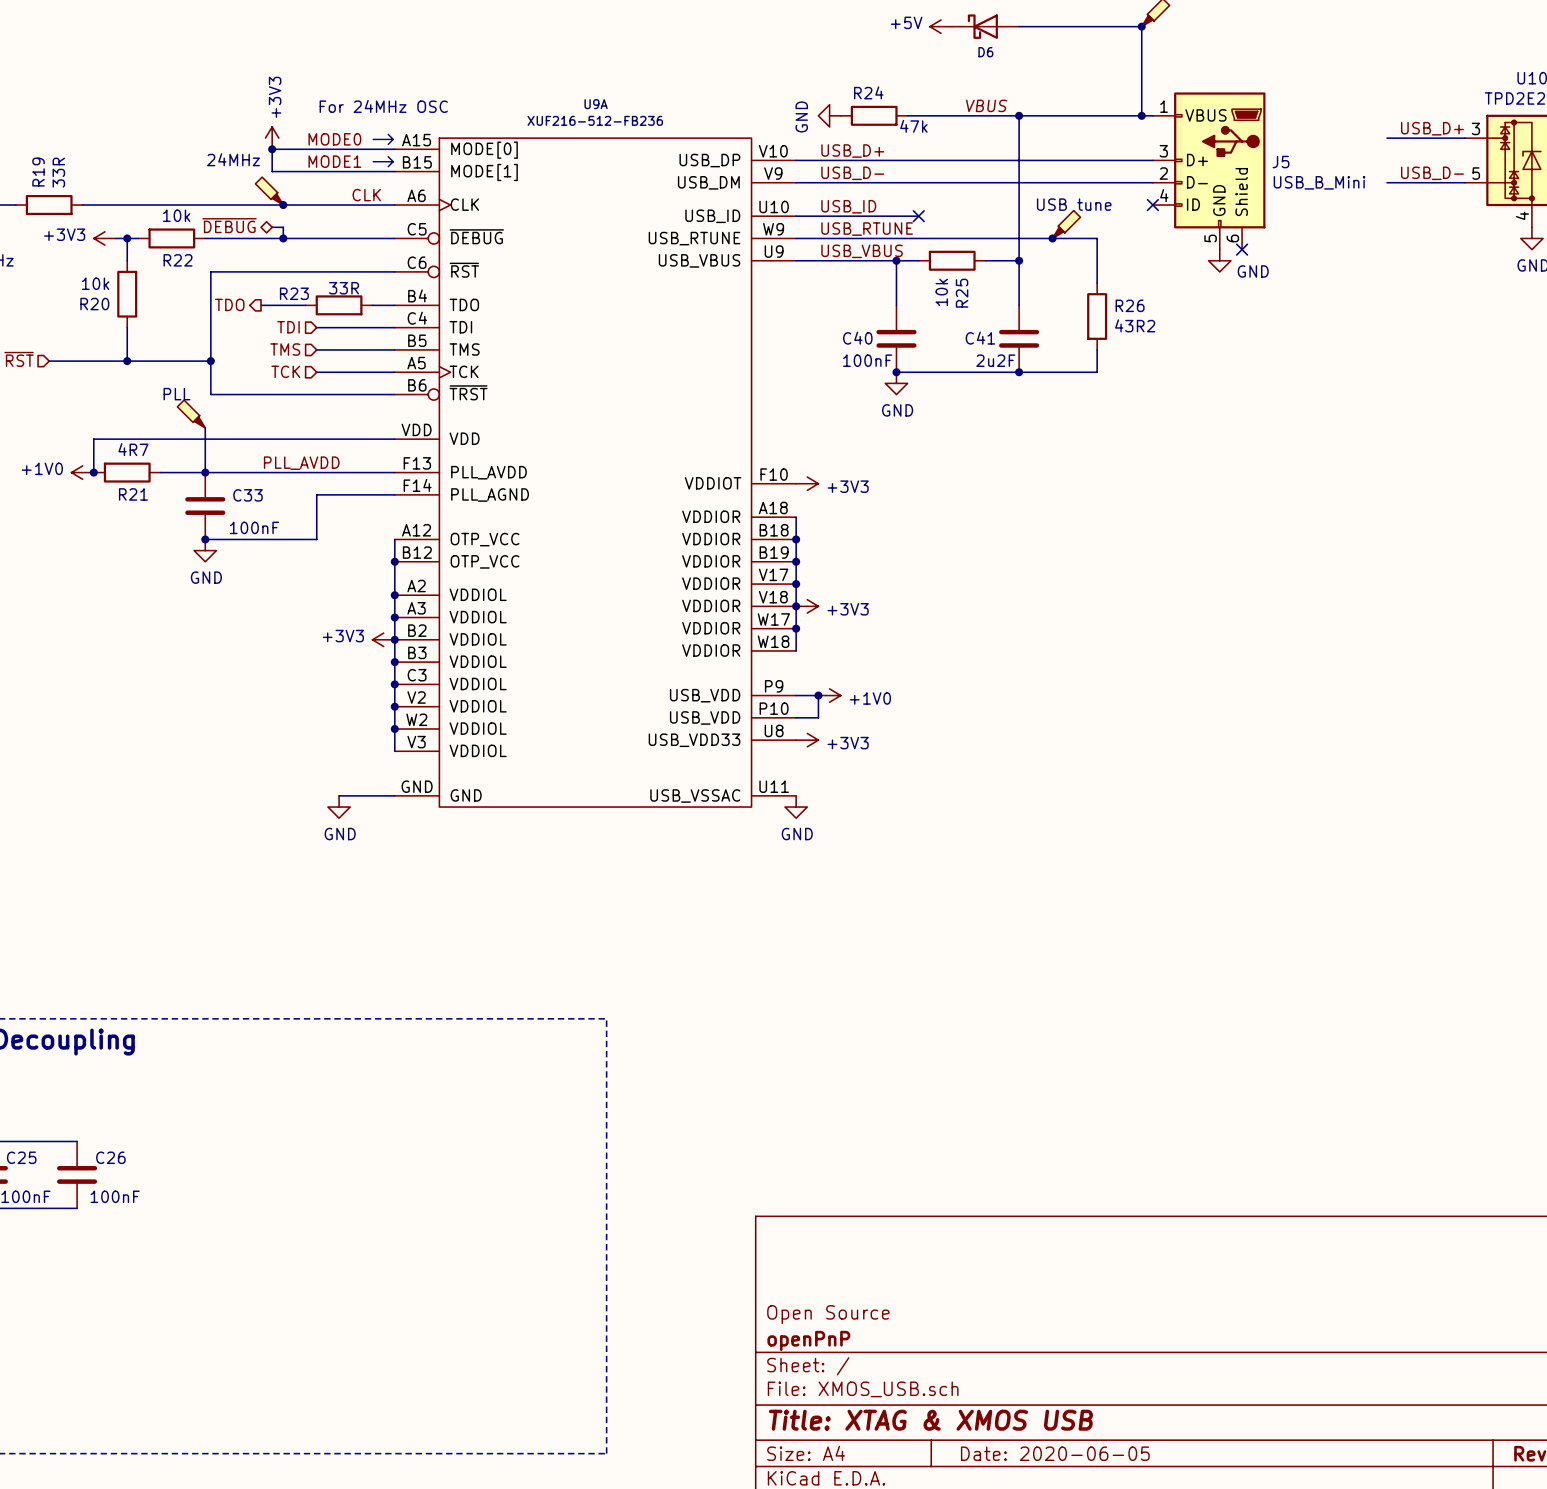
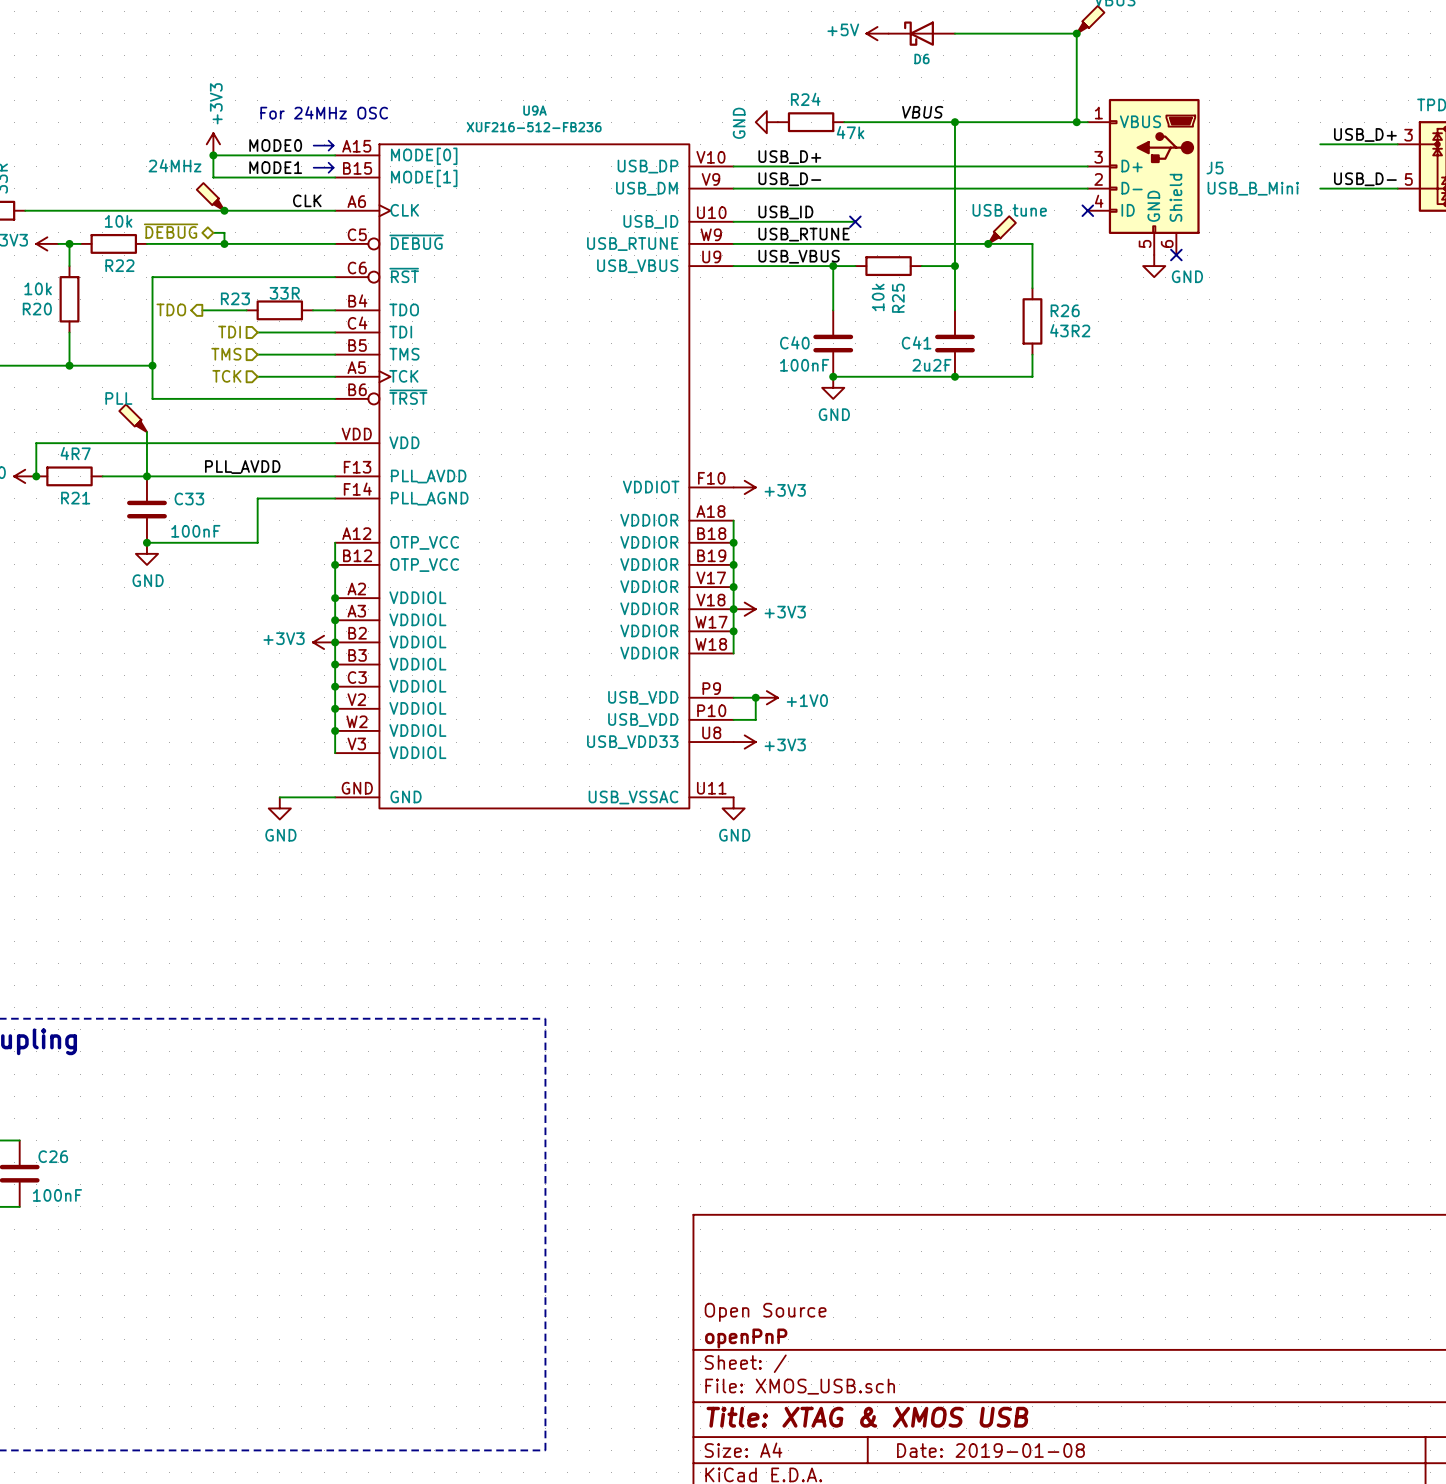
title block: Date: 2020-06-05 (1055, 1453) -> Date: 2019-01-08 (990, 1450)

